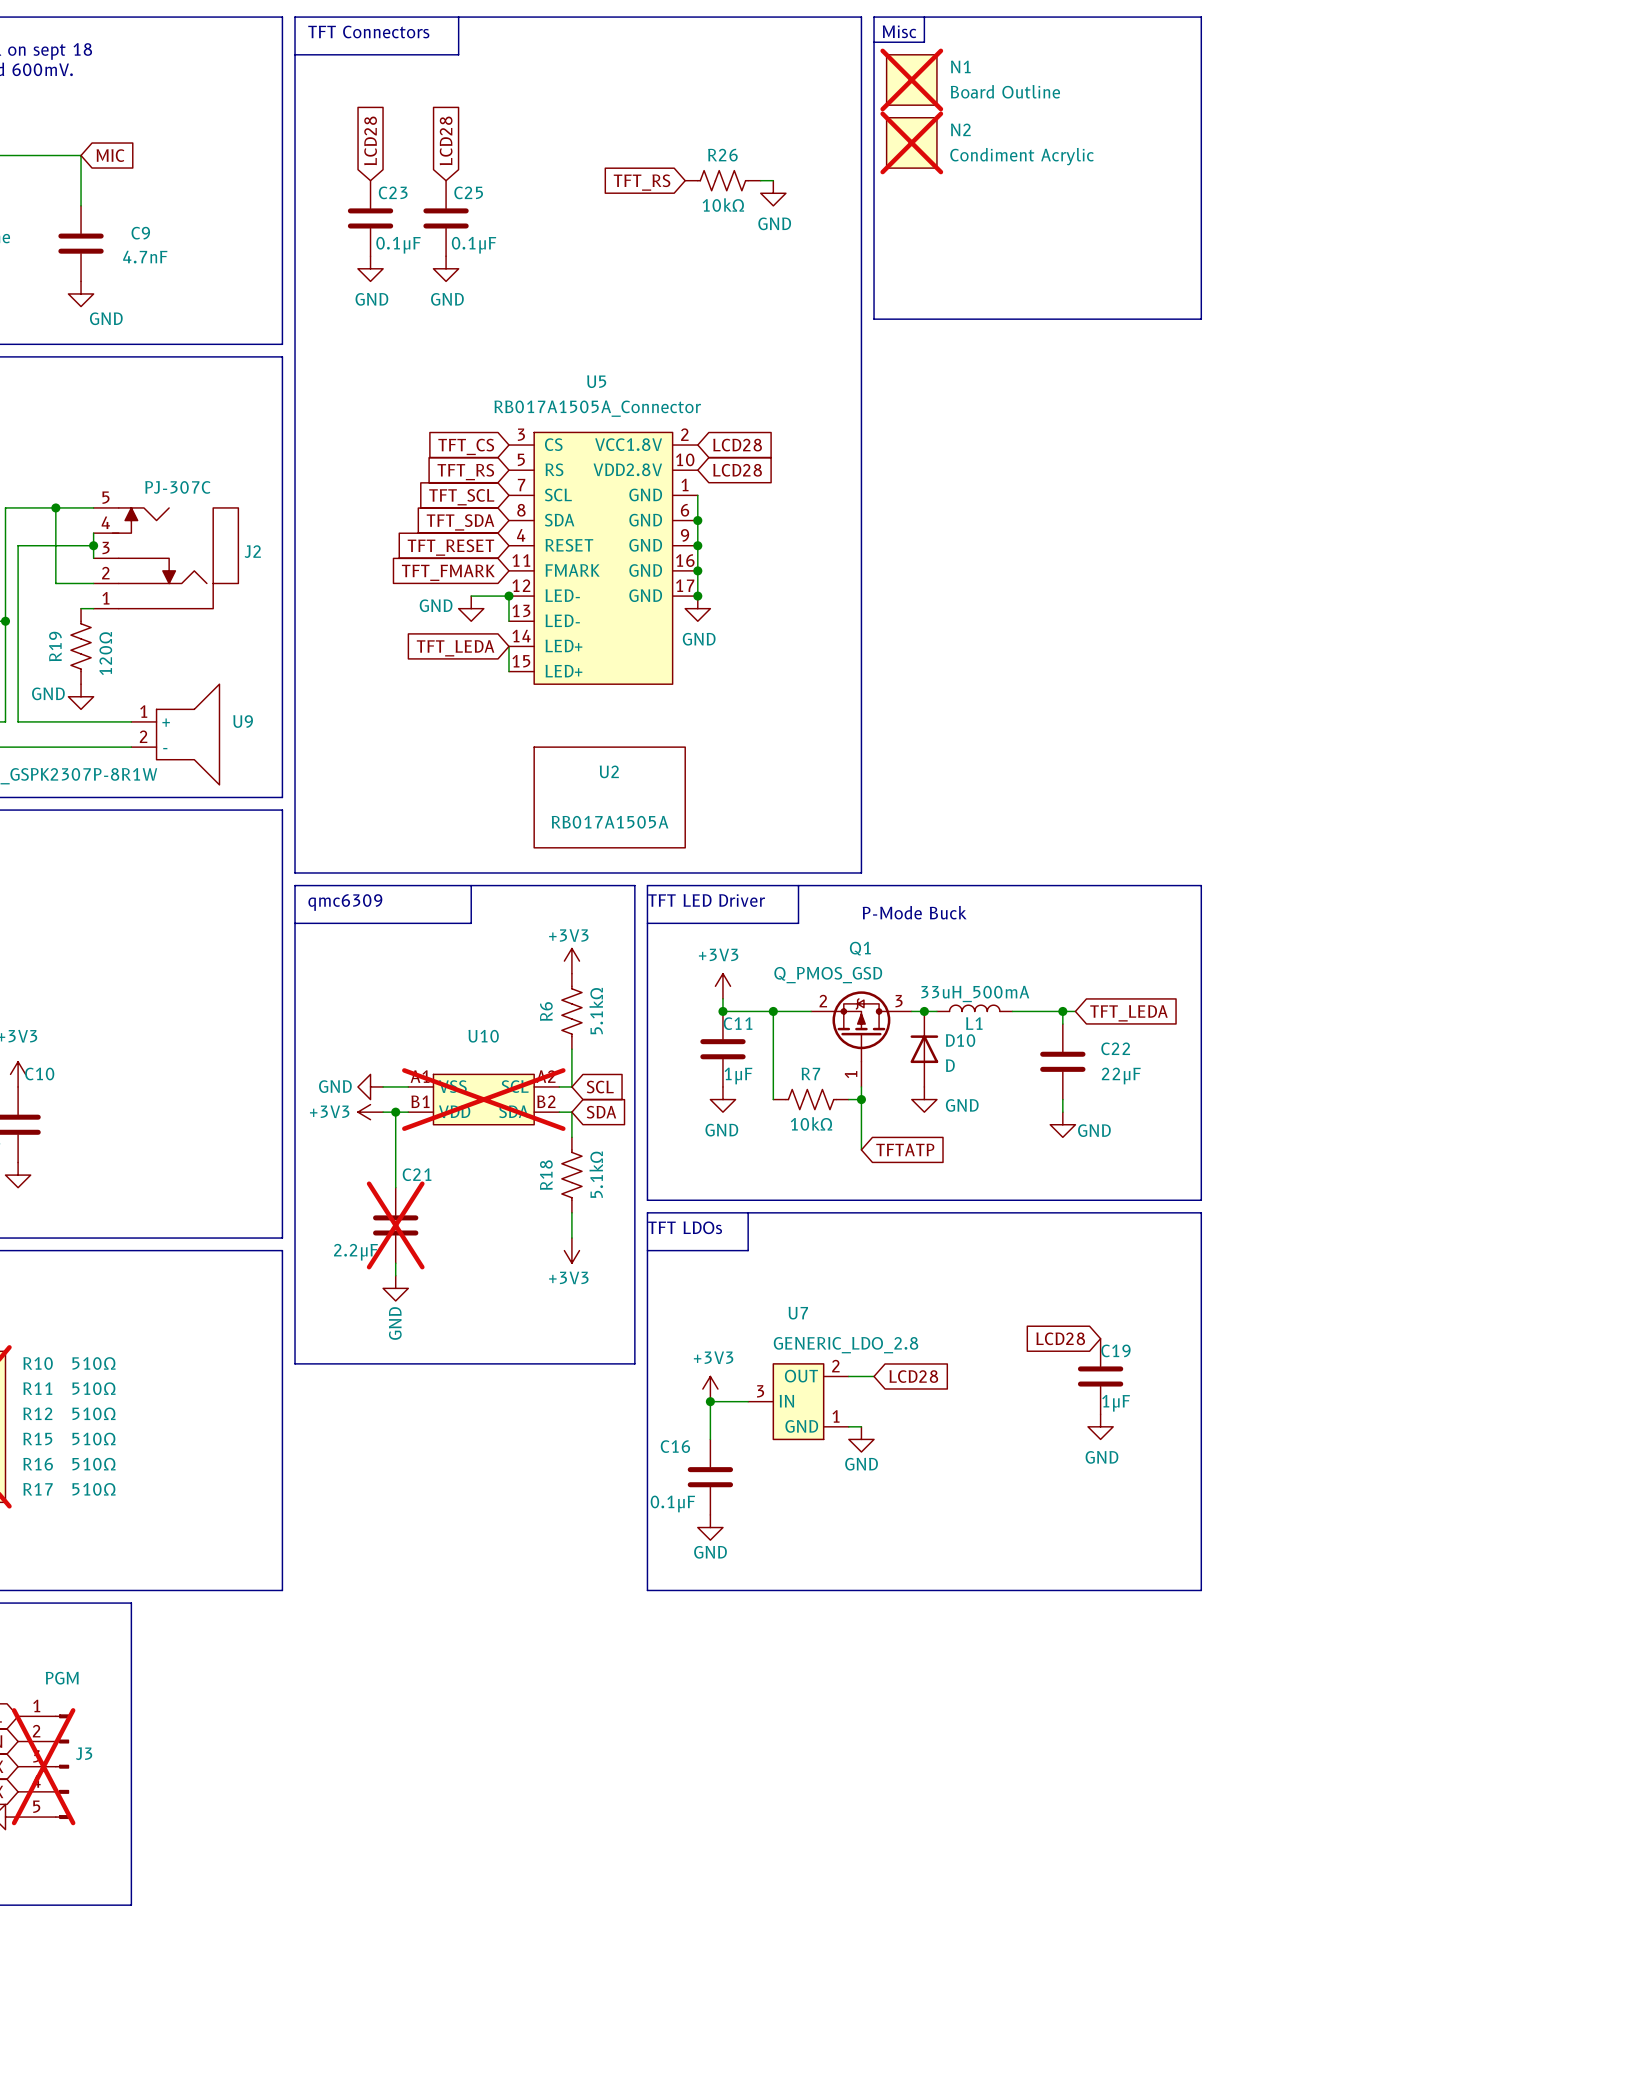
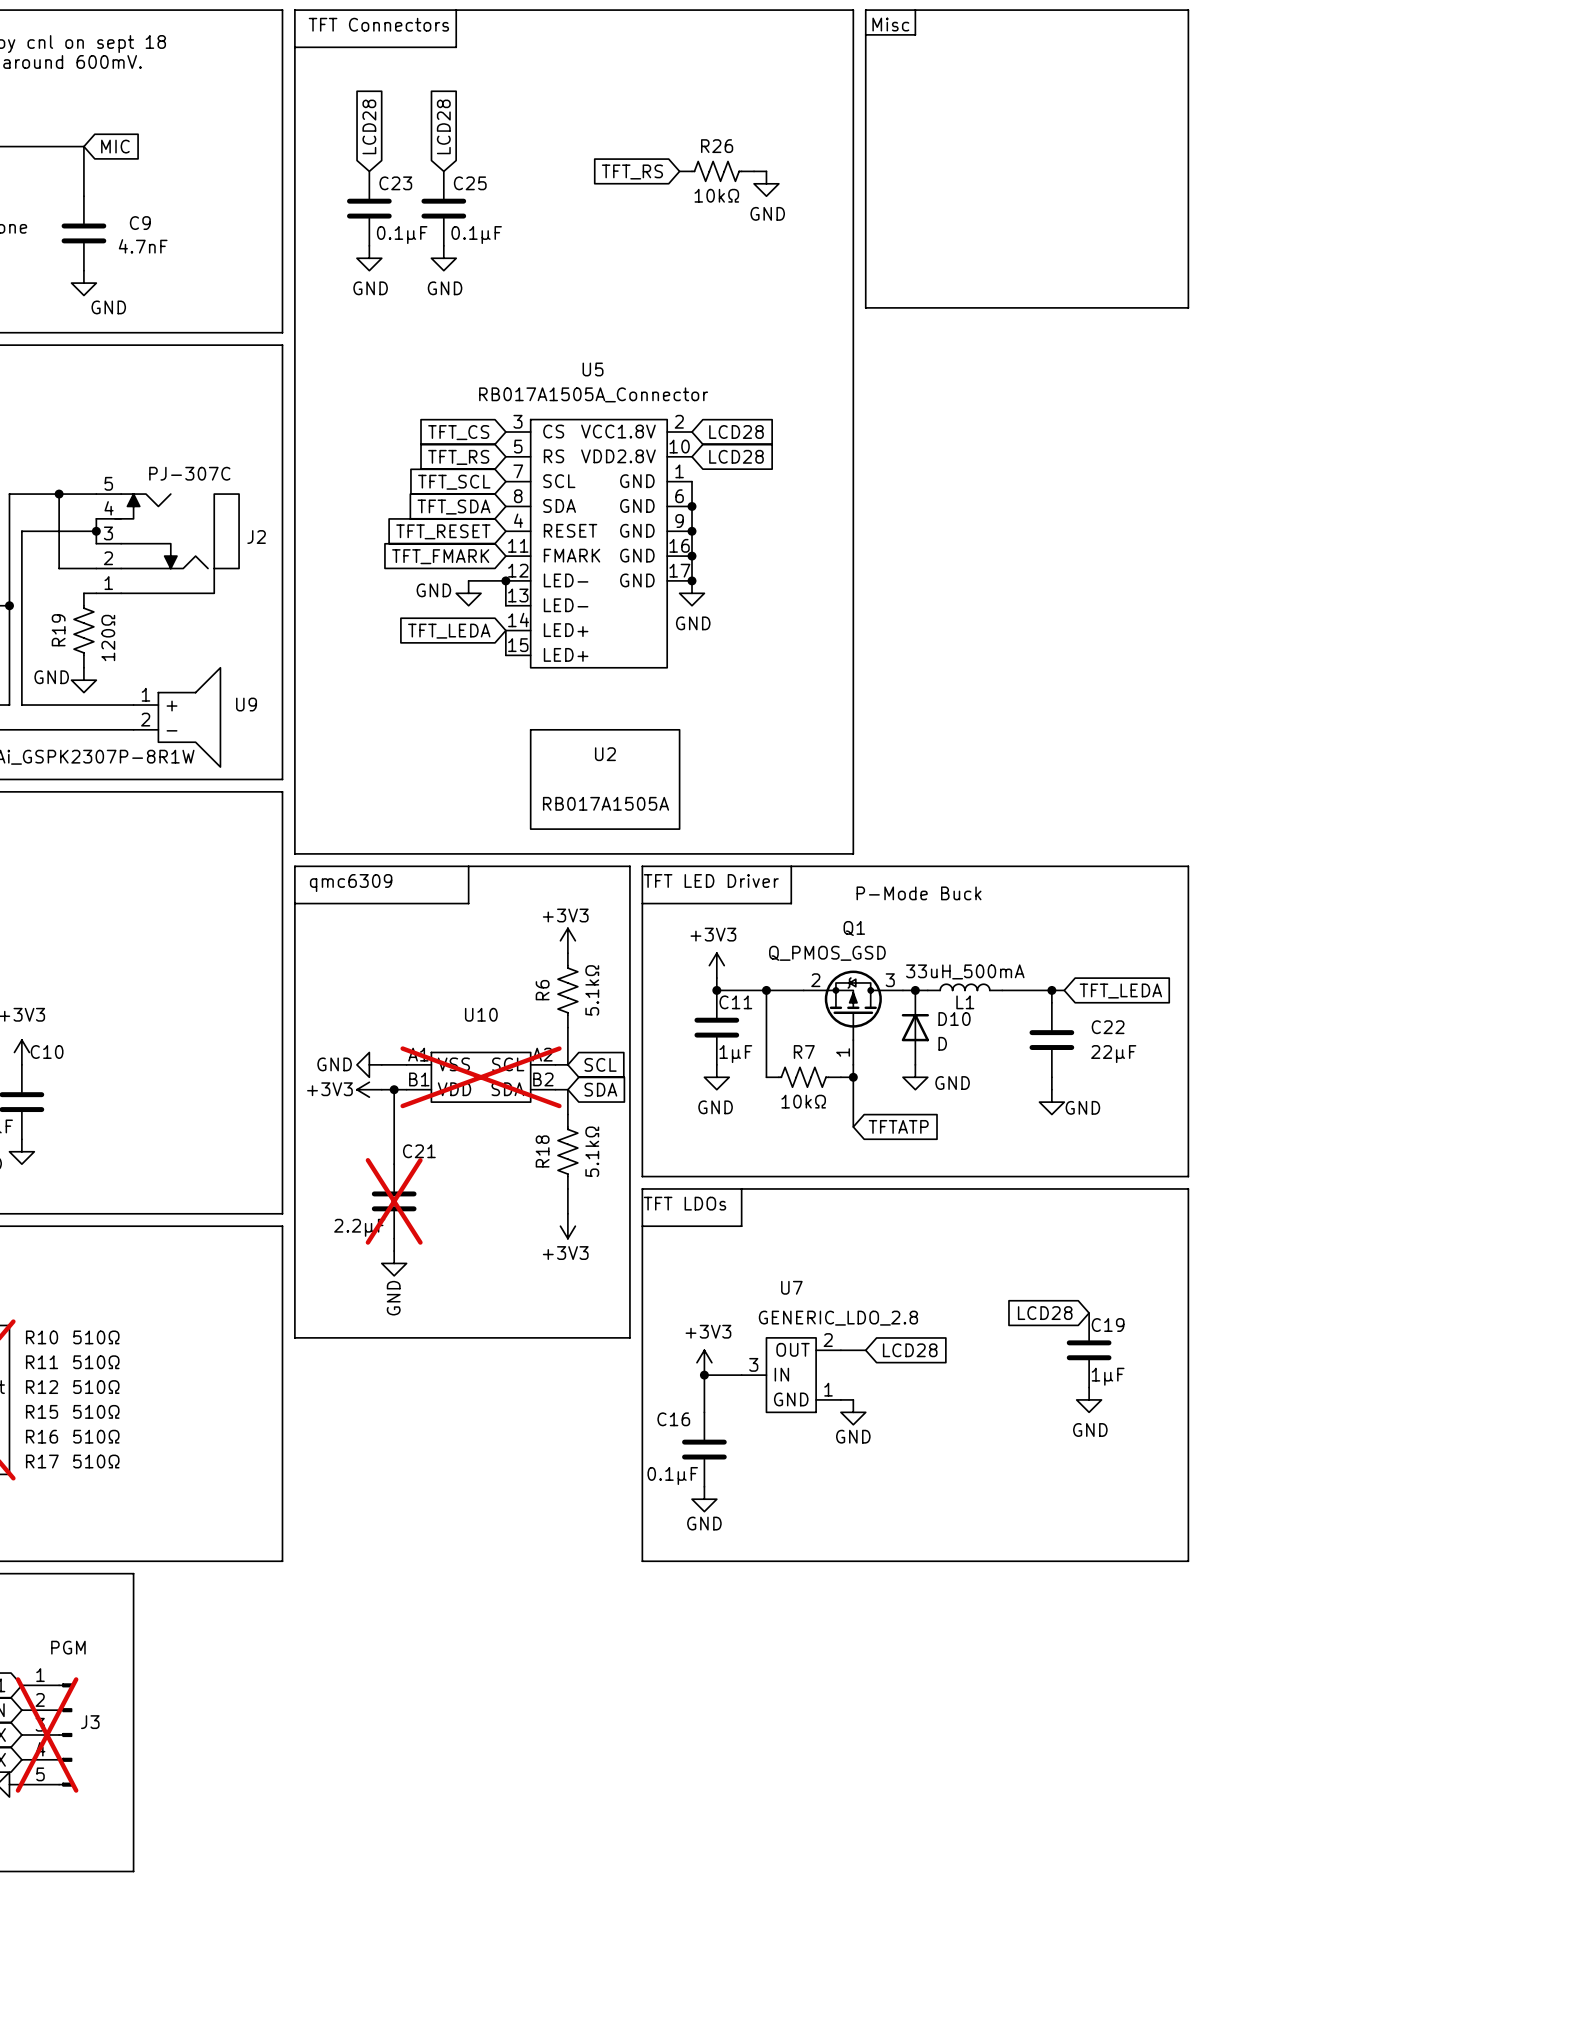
N1: Board Outline (911, 79) -> none
N2: Condiment Acrylic (911, 142) -> none

